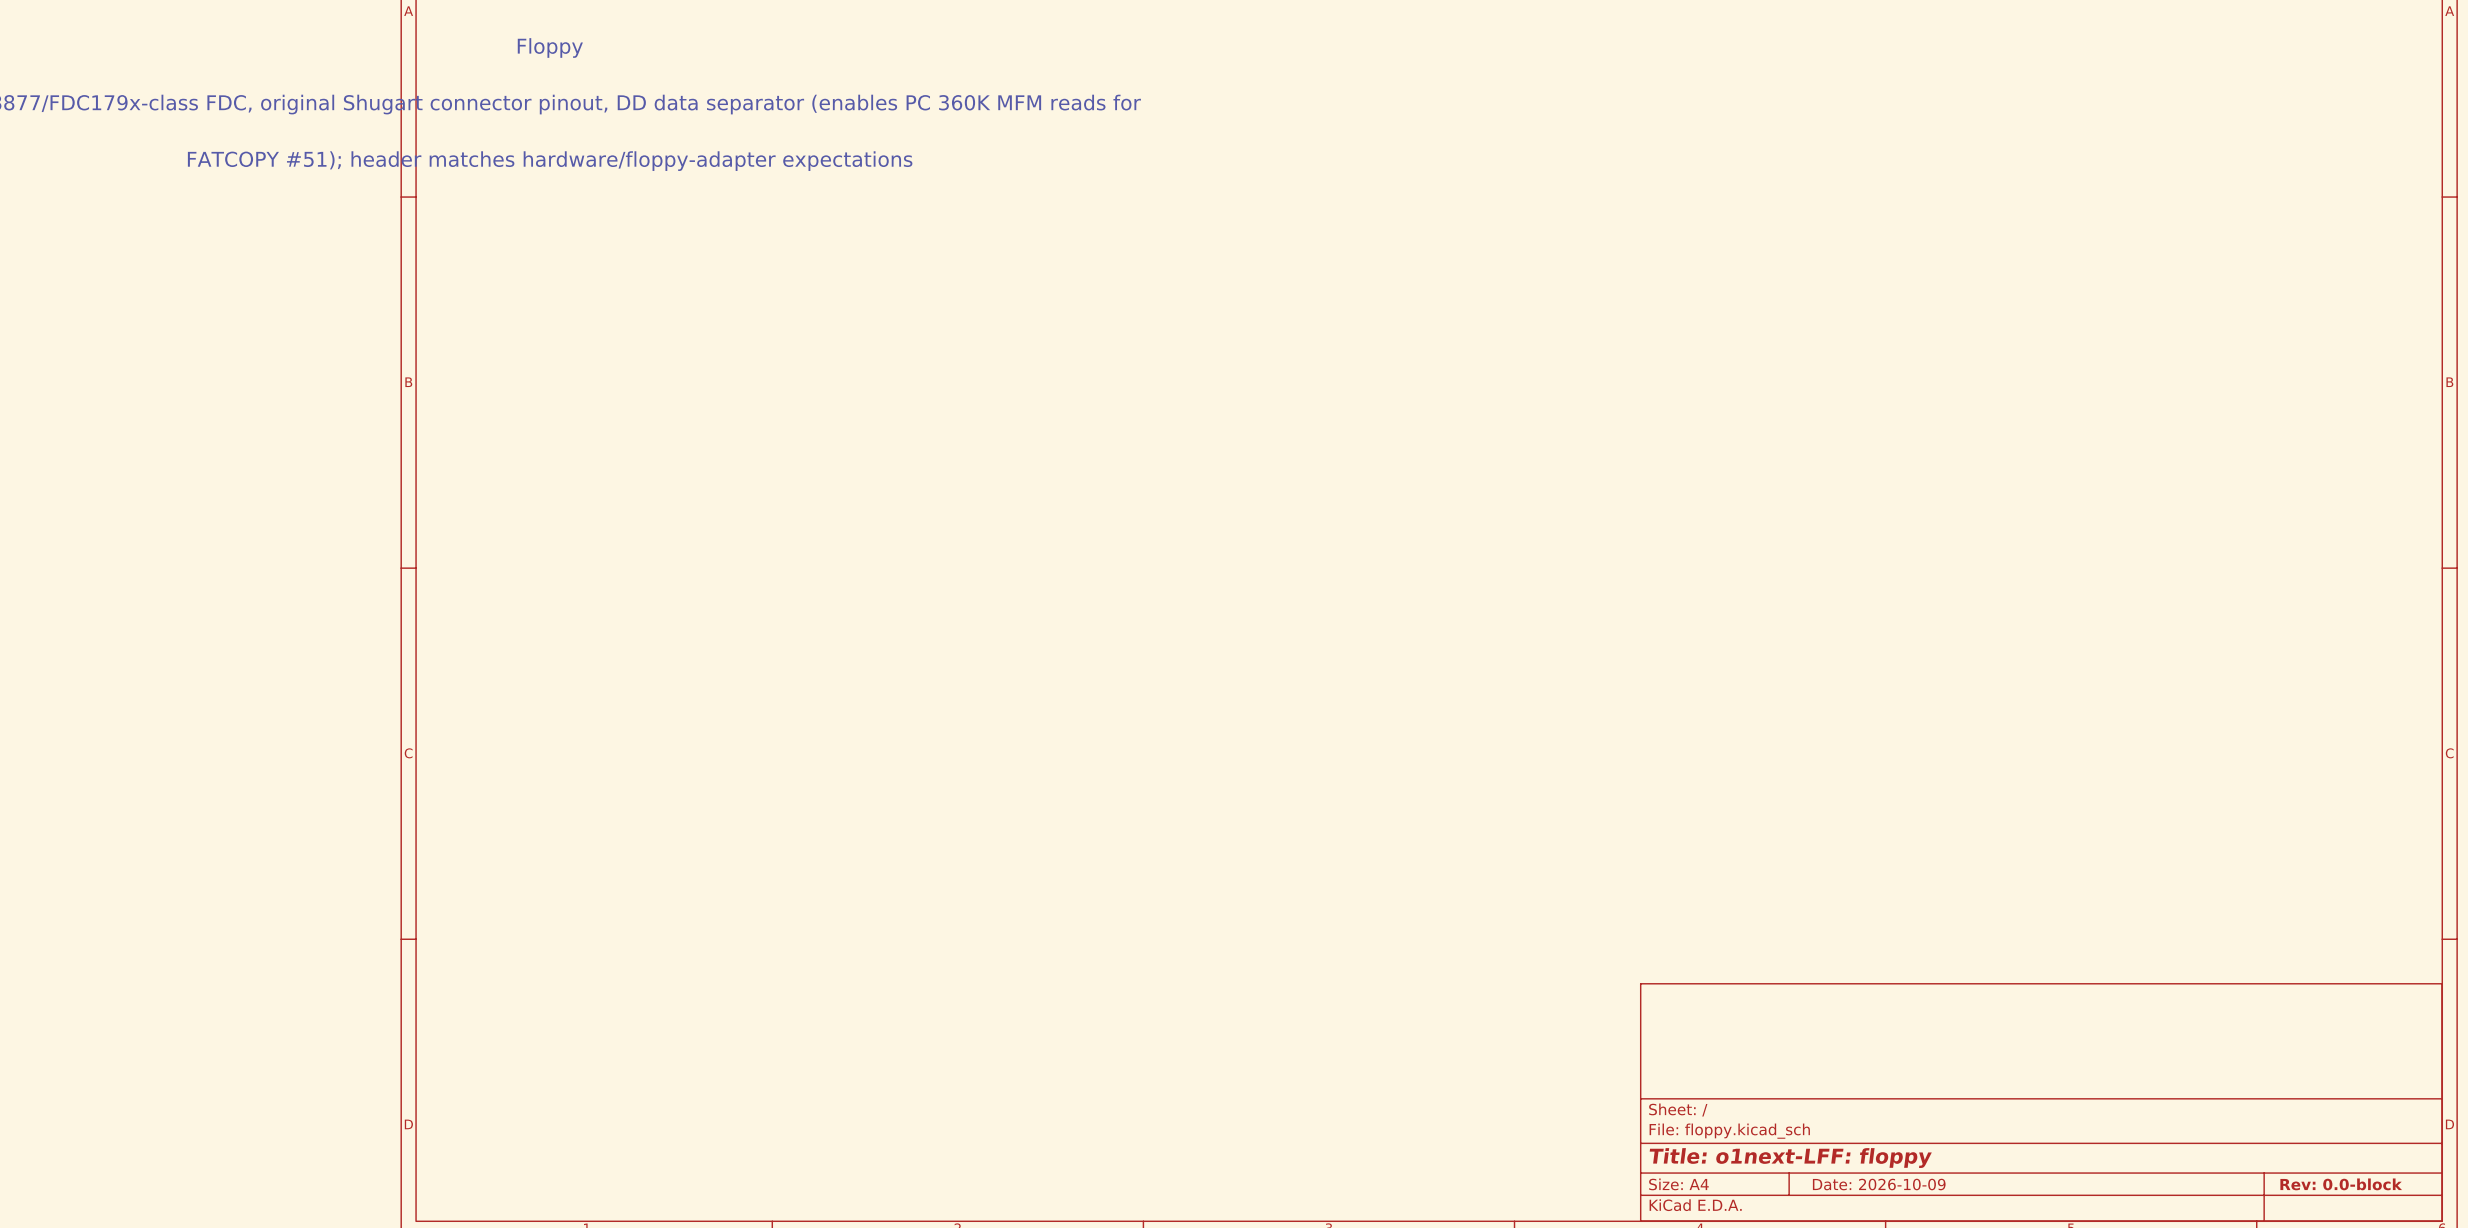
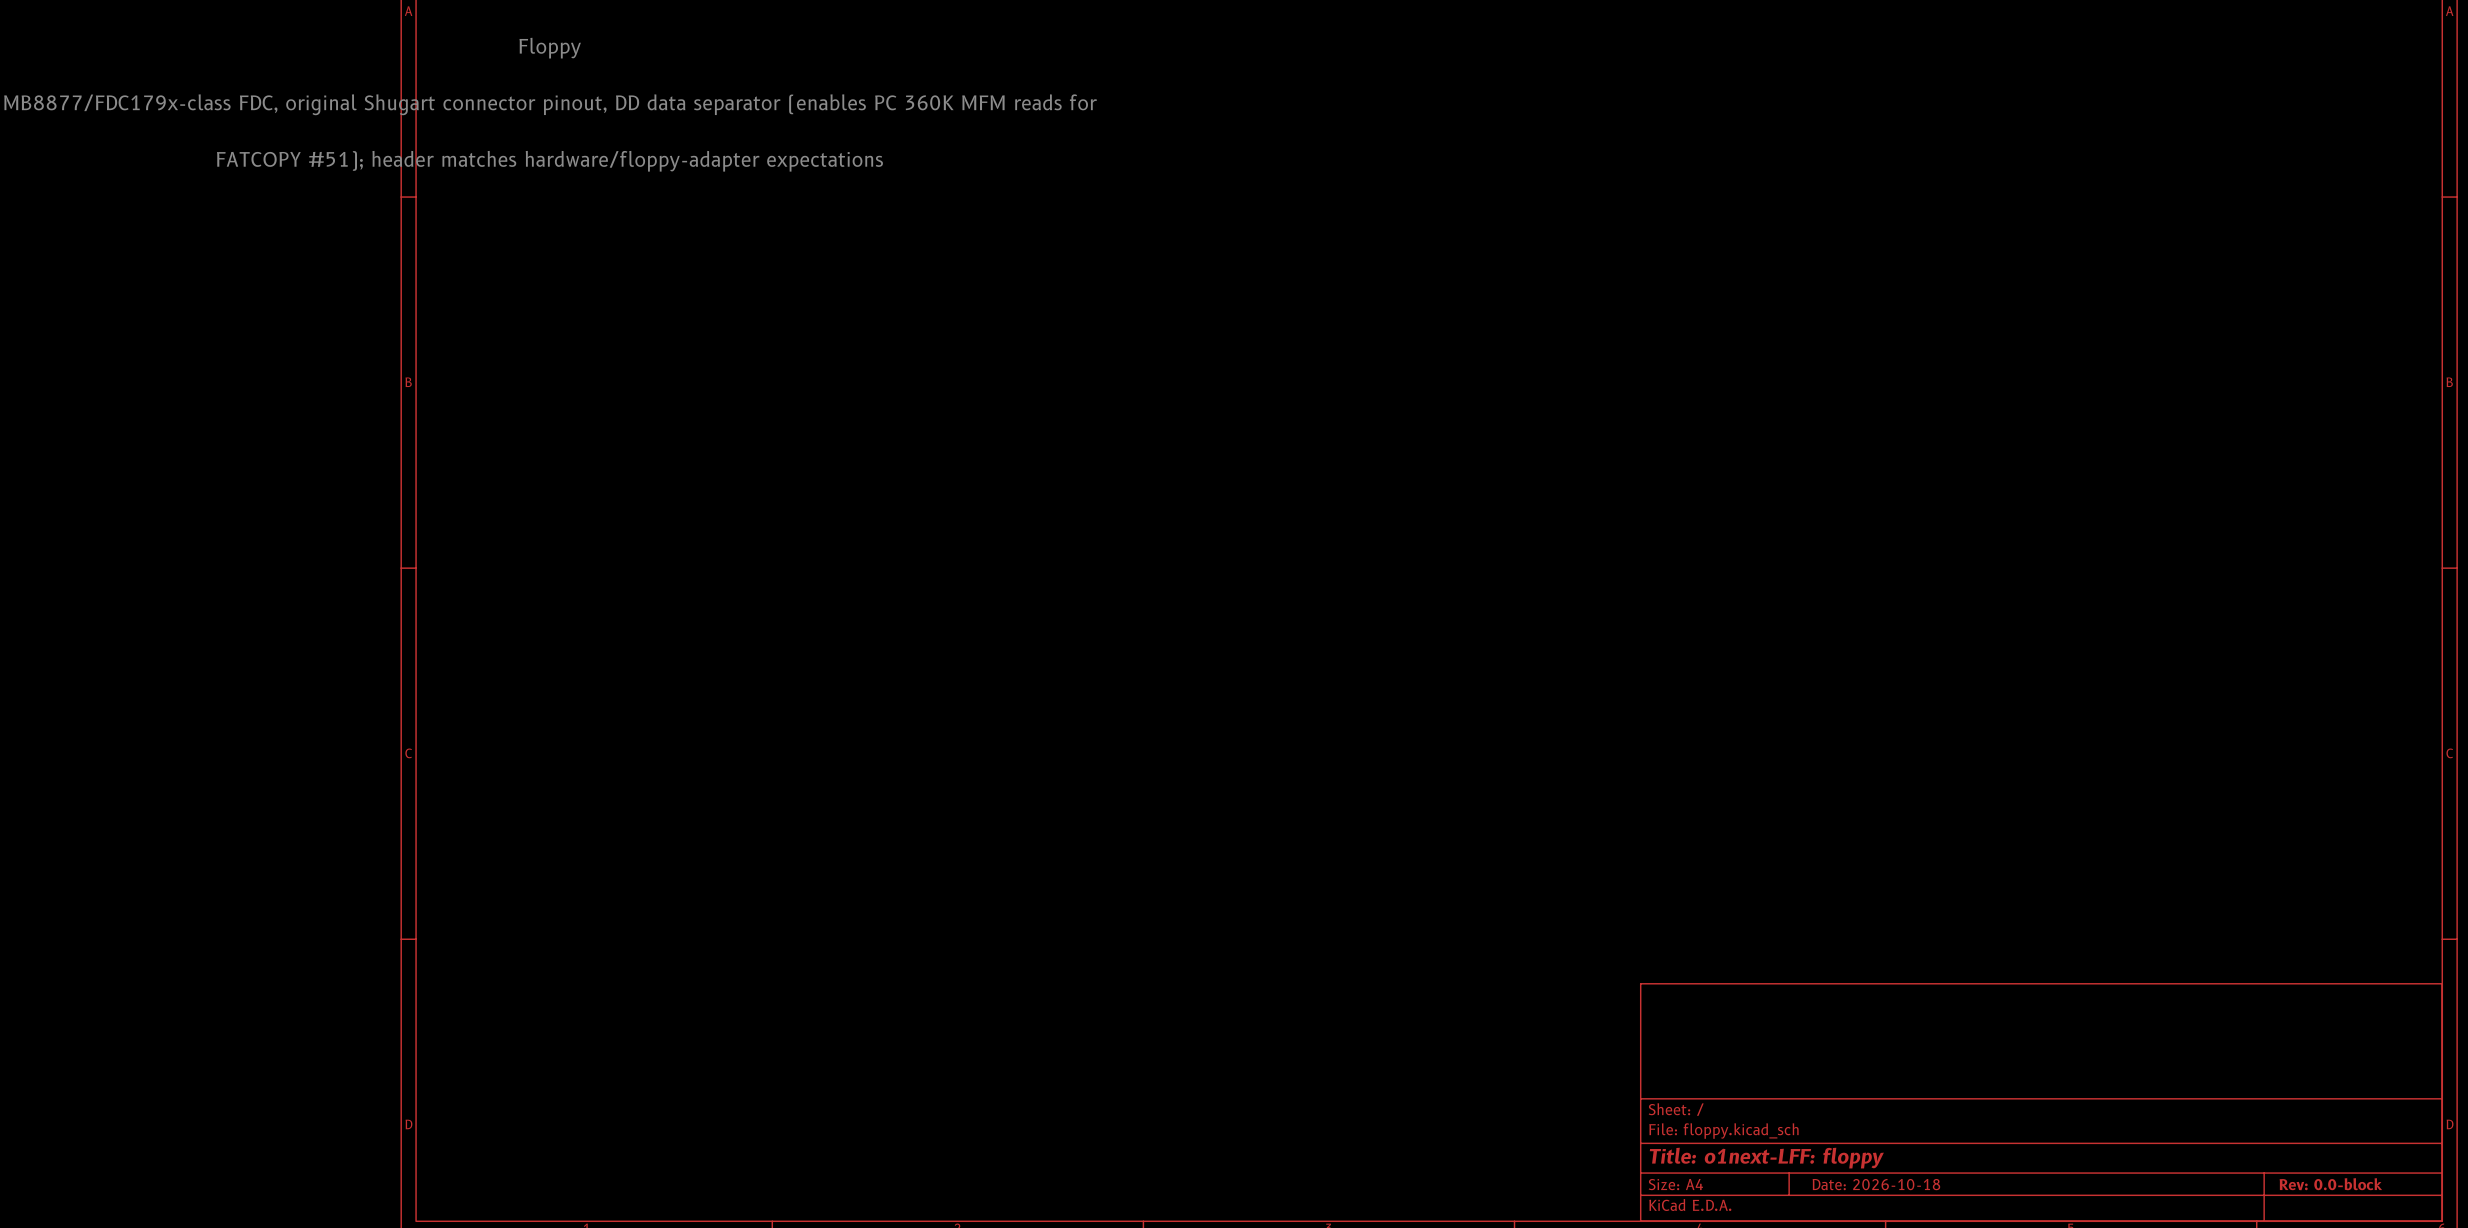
title block: Date: 2026-10-09 (1879, 1184) -> Date: 2026-10-18 (1876, 1184)

